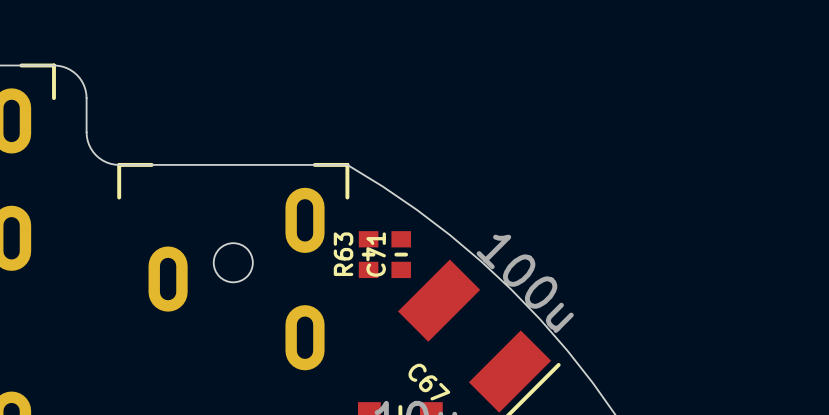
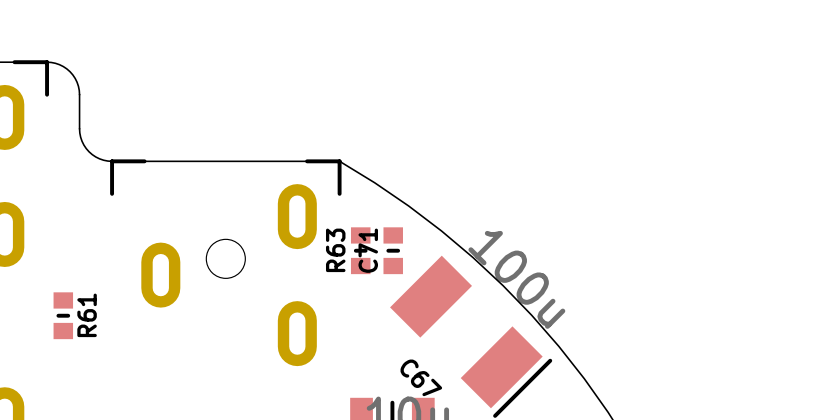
R61: none -> (63, 315)

